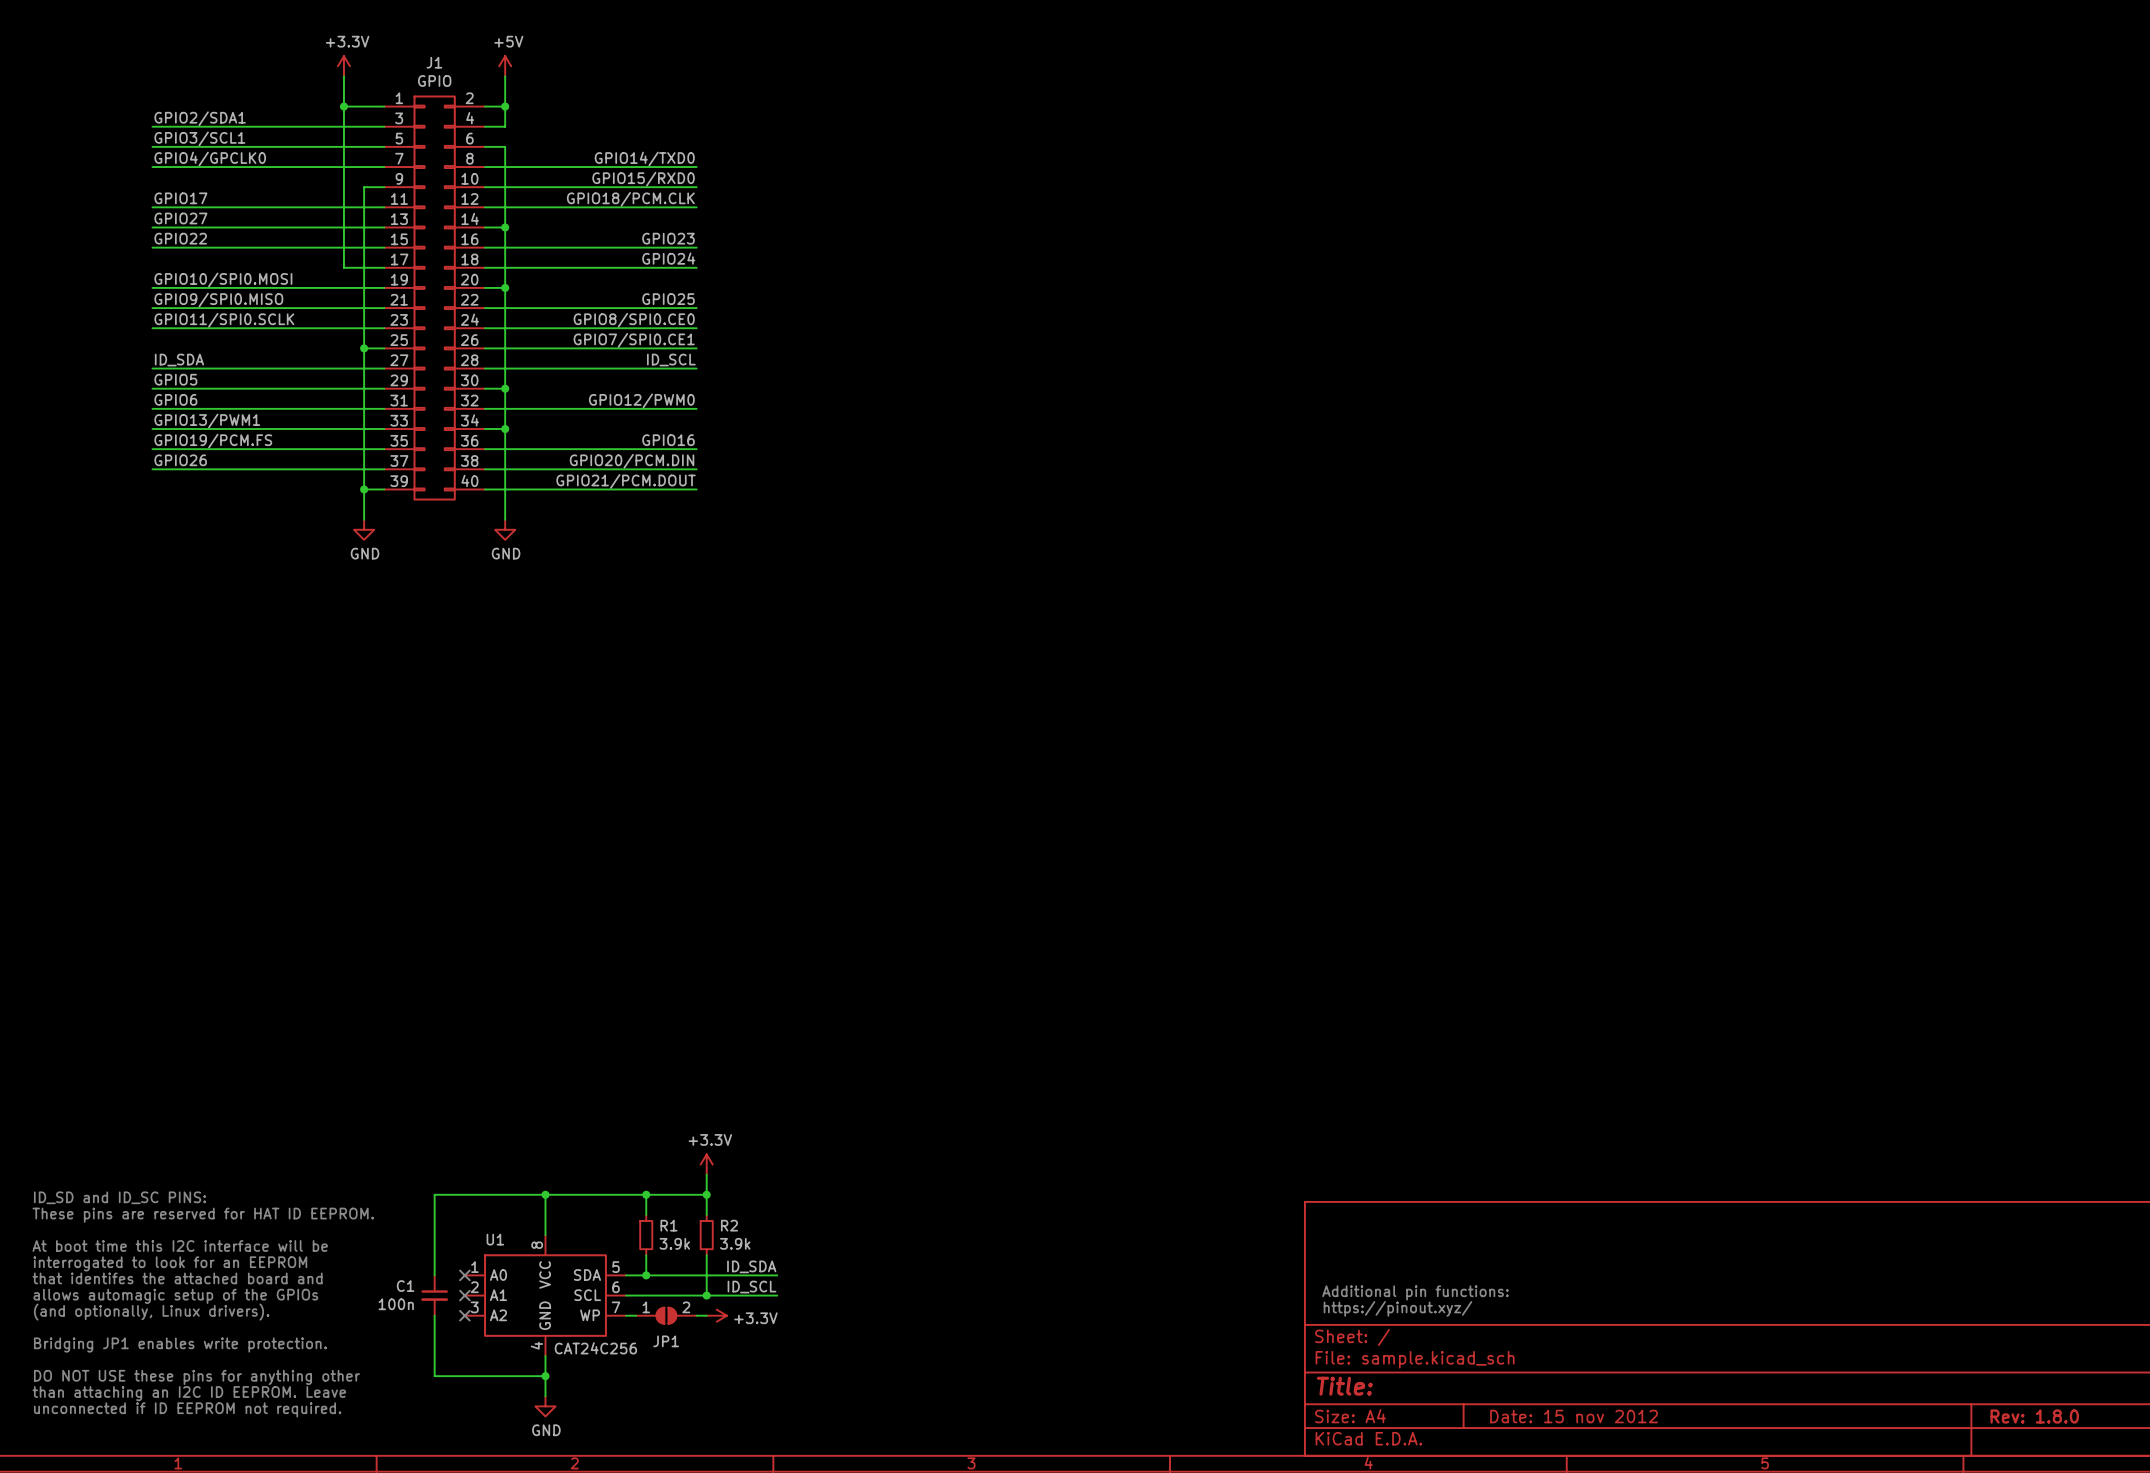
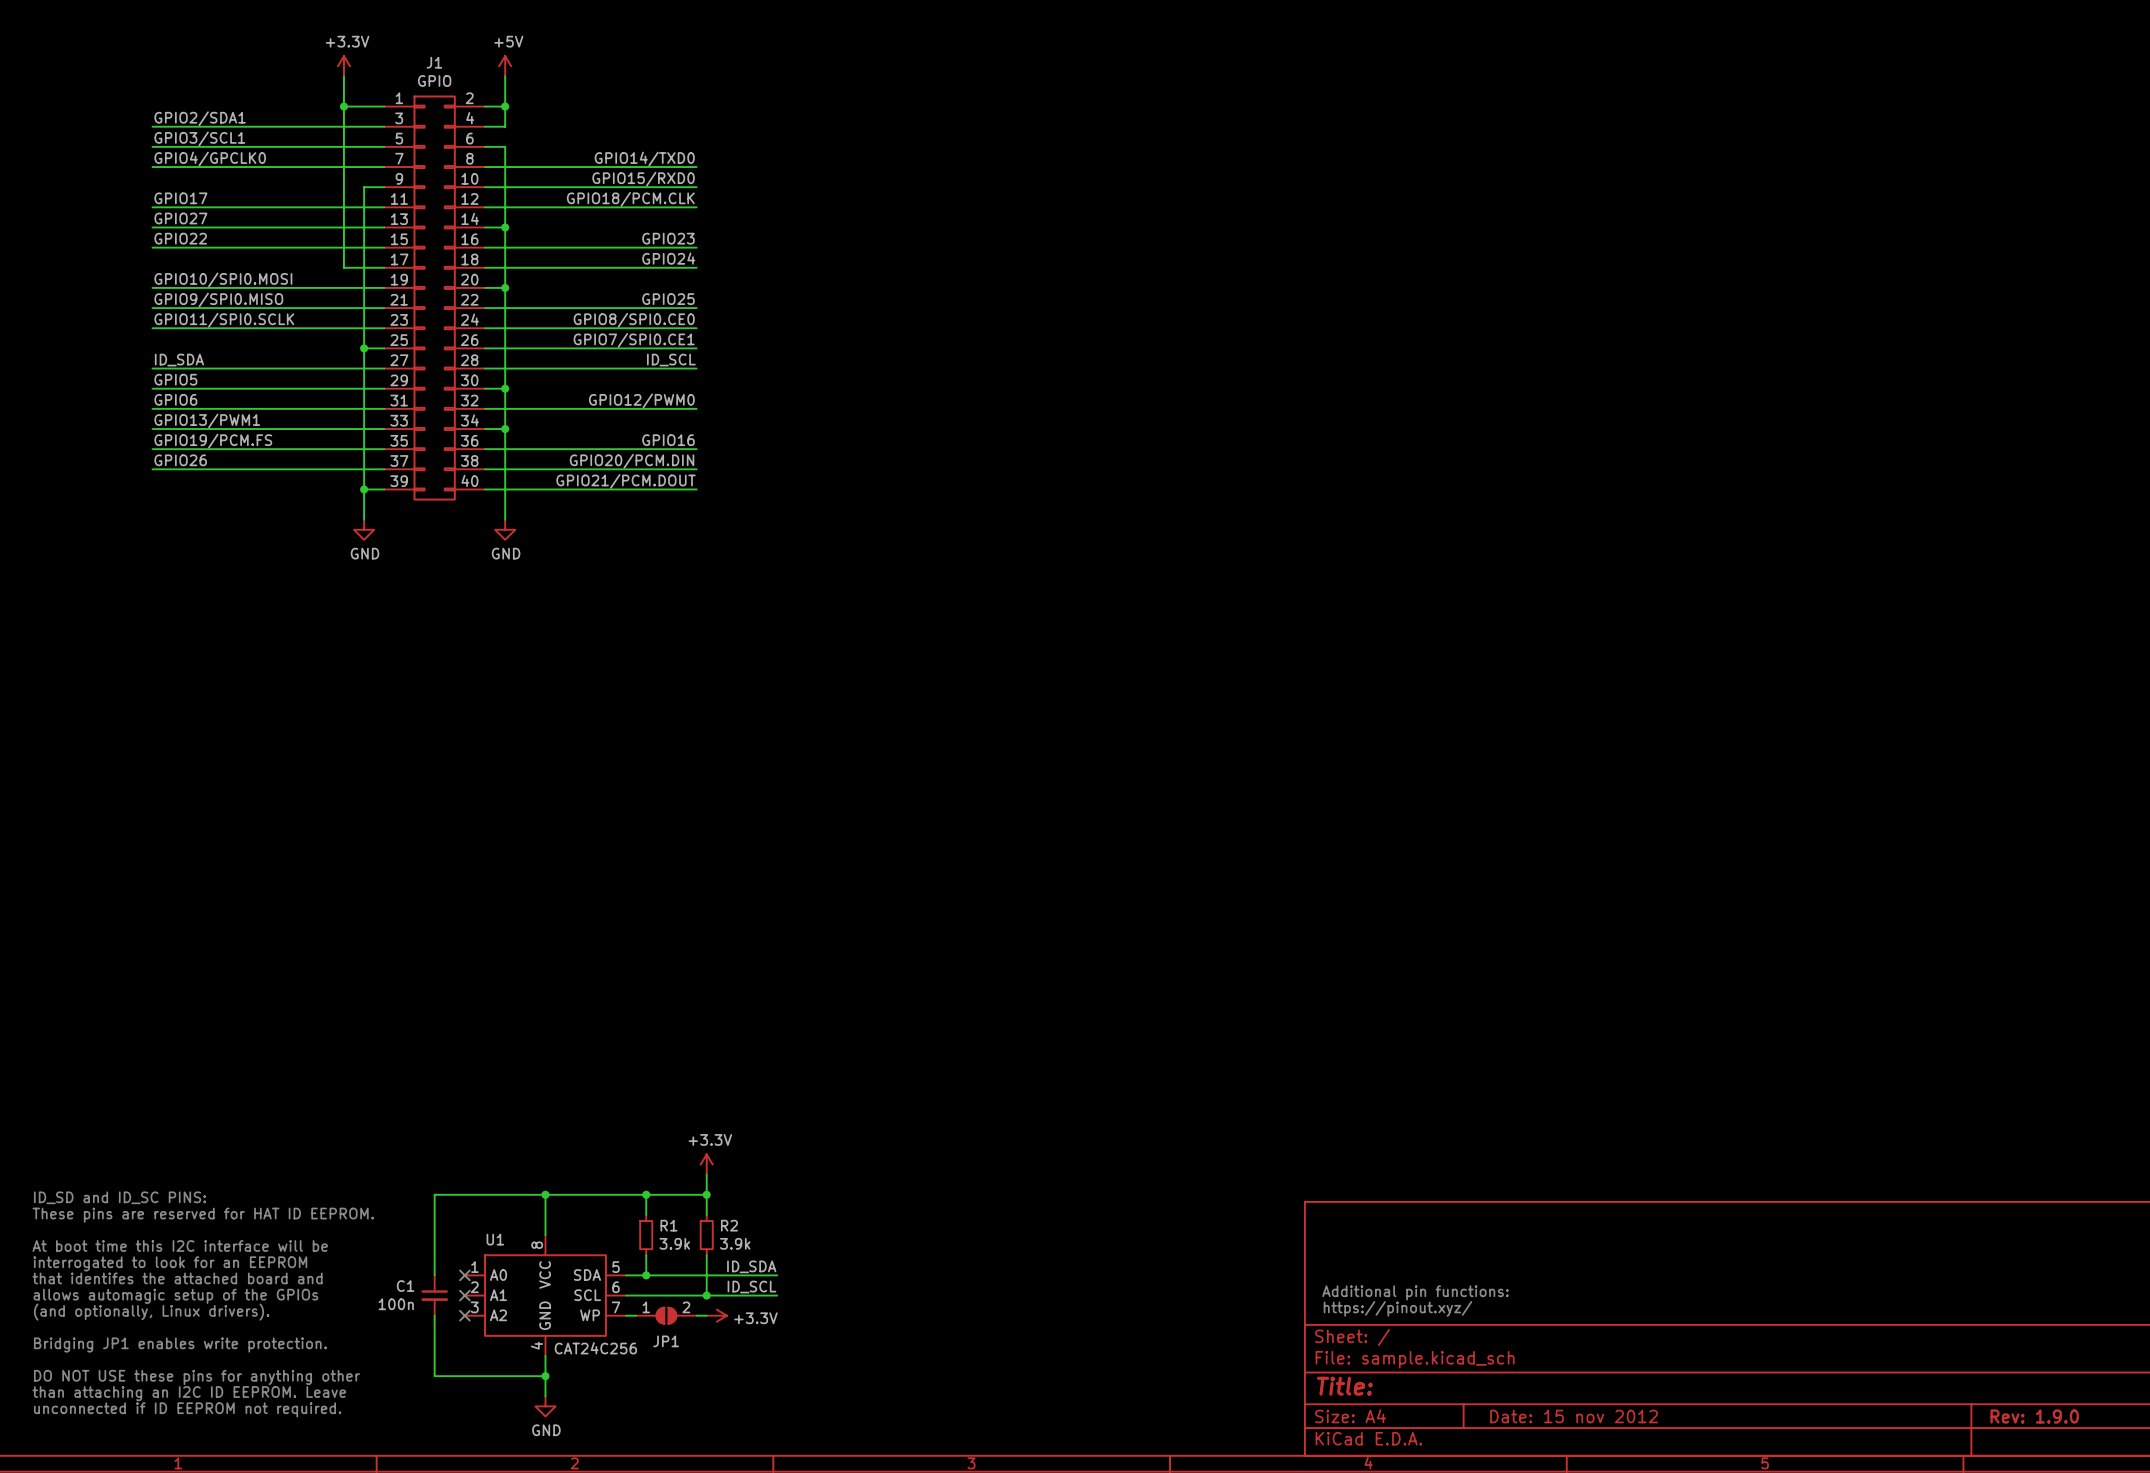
title block: Rev: 1.8.0 (2034, 1416) -> Rev: 1.9.0 (2034, 1416)

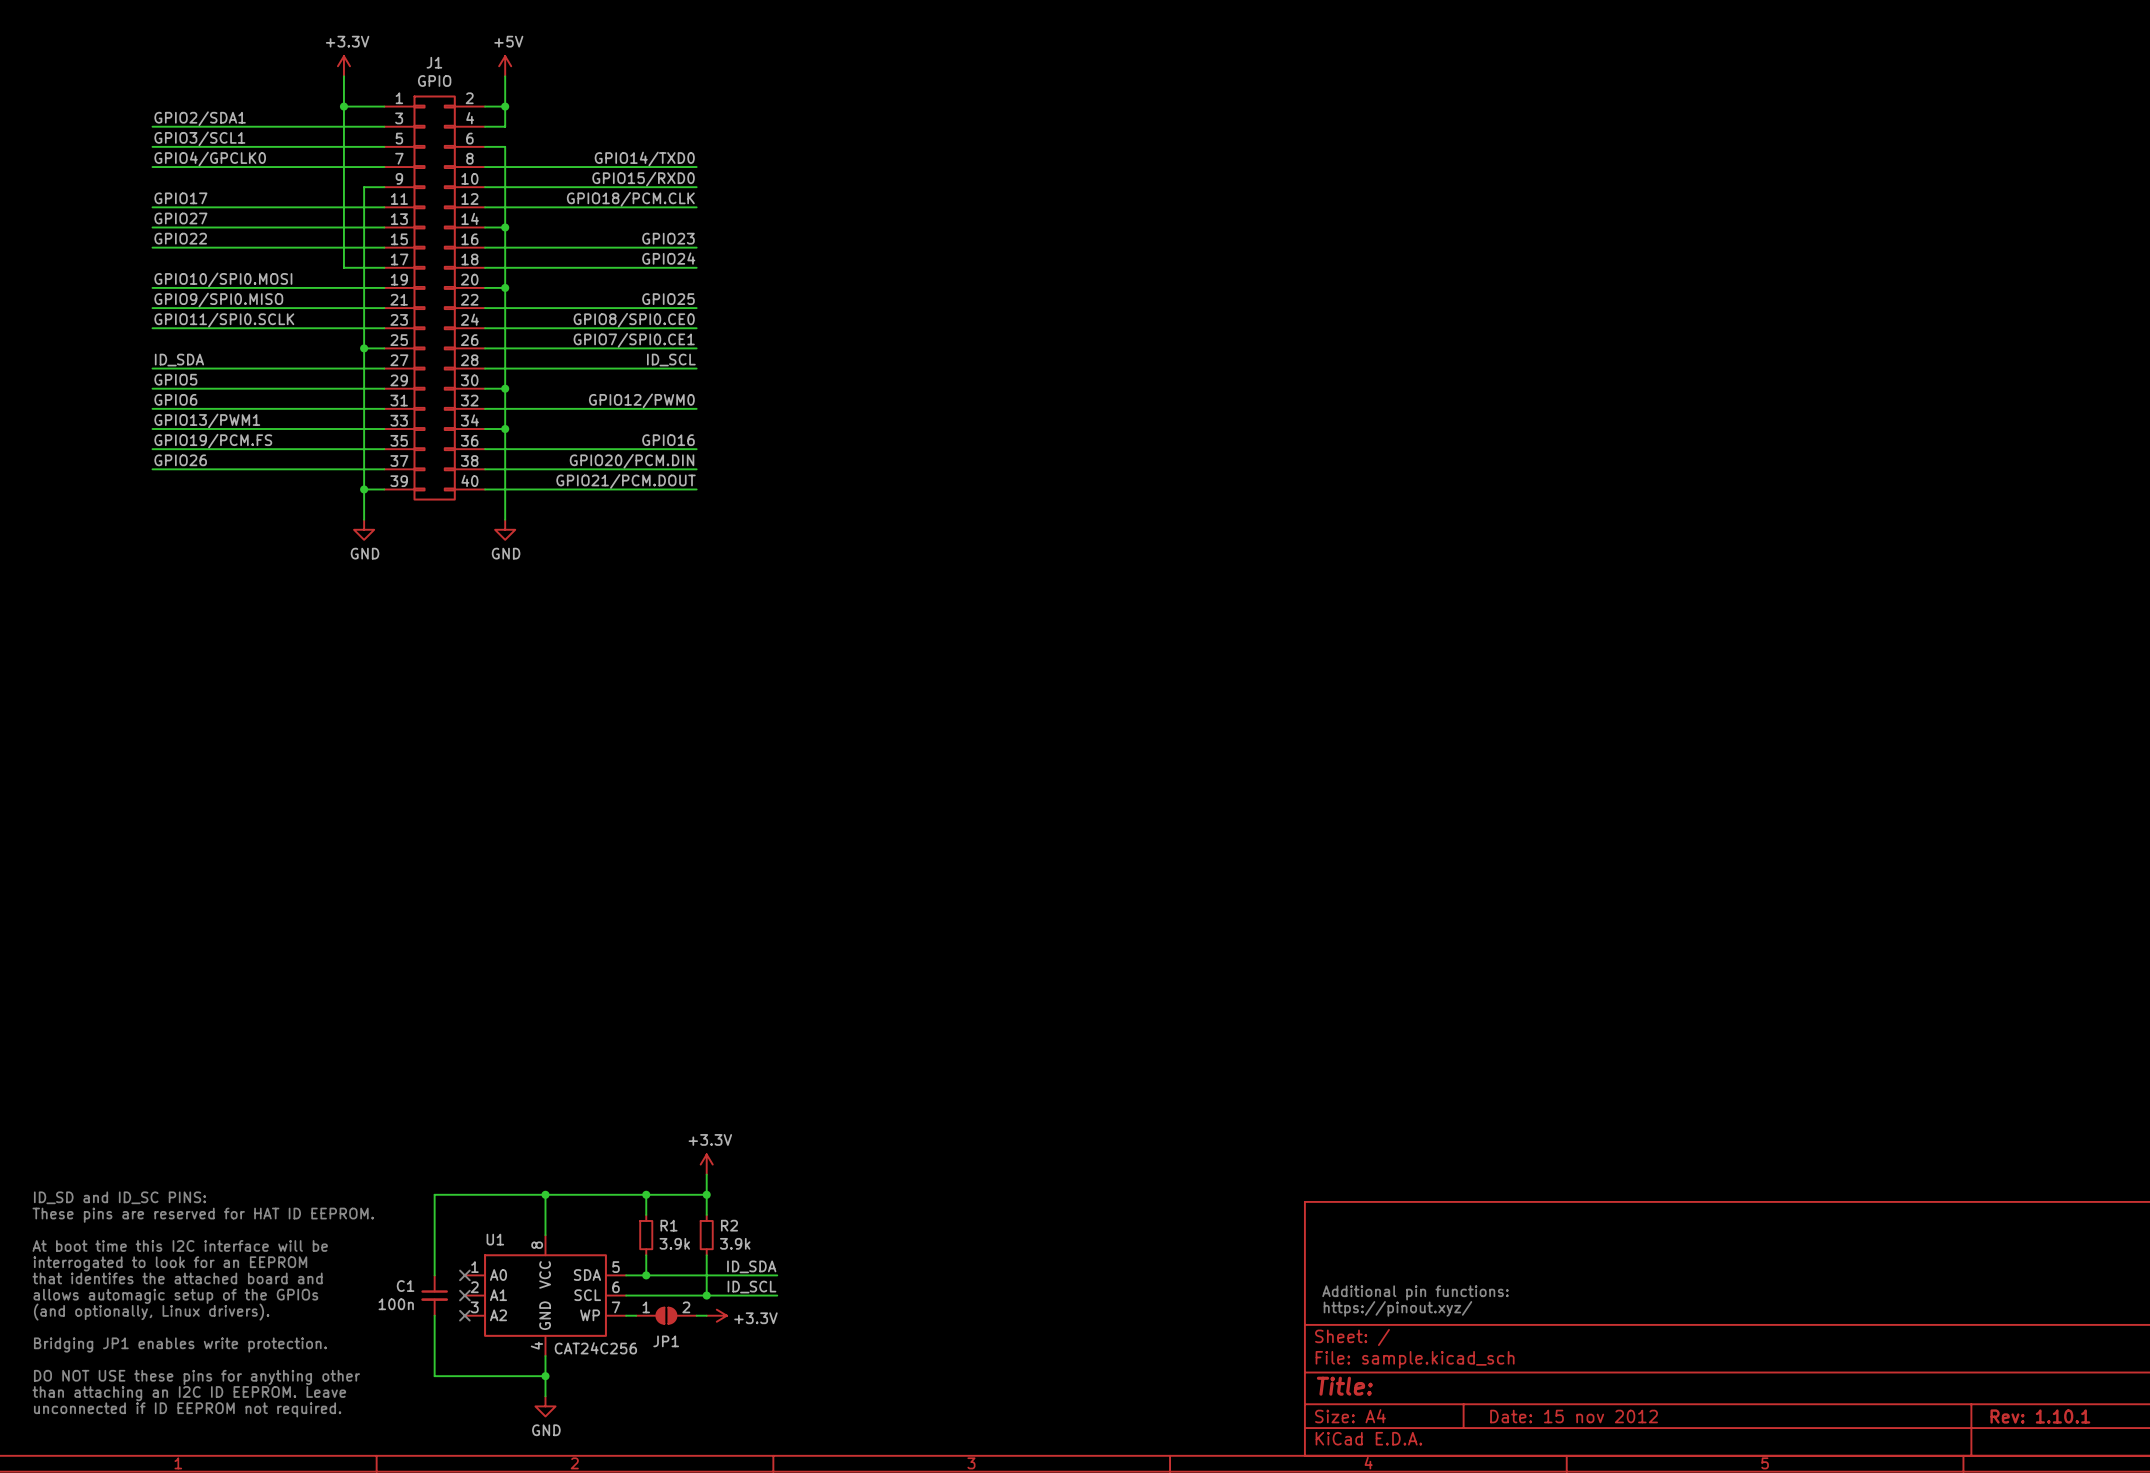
title block: Rev: 1.9.0 (2034, 1416) -> Rev: 1.10.1 (2040, 1416)

